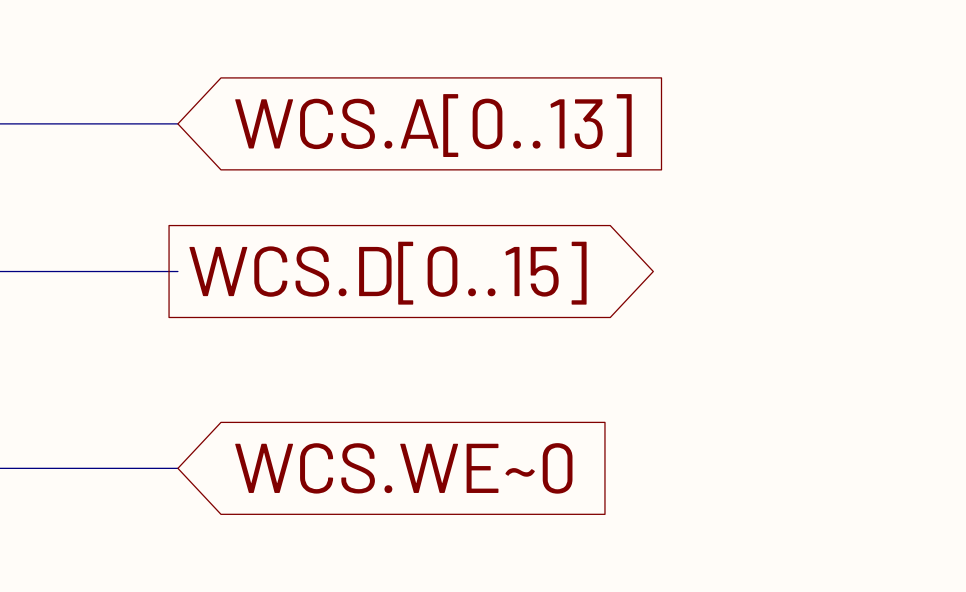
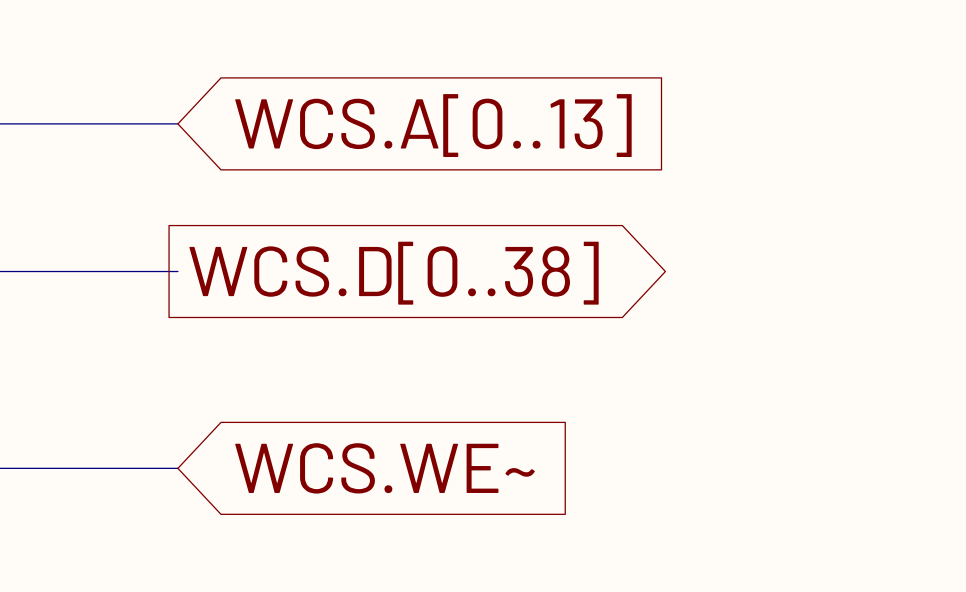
global label: WCS.D[0..15] (387, 273) -> WCS.D[0..38] (394, 273)
global label: WCS.WE~0 (403, 468) -> WCS.WE~ (385, 468)

